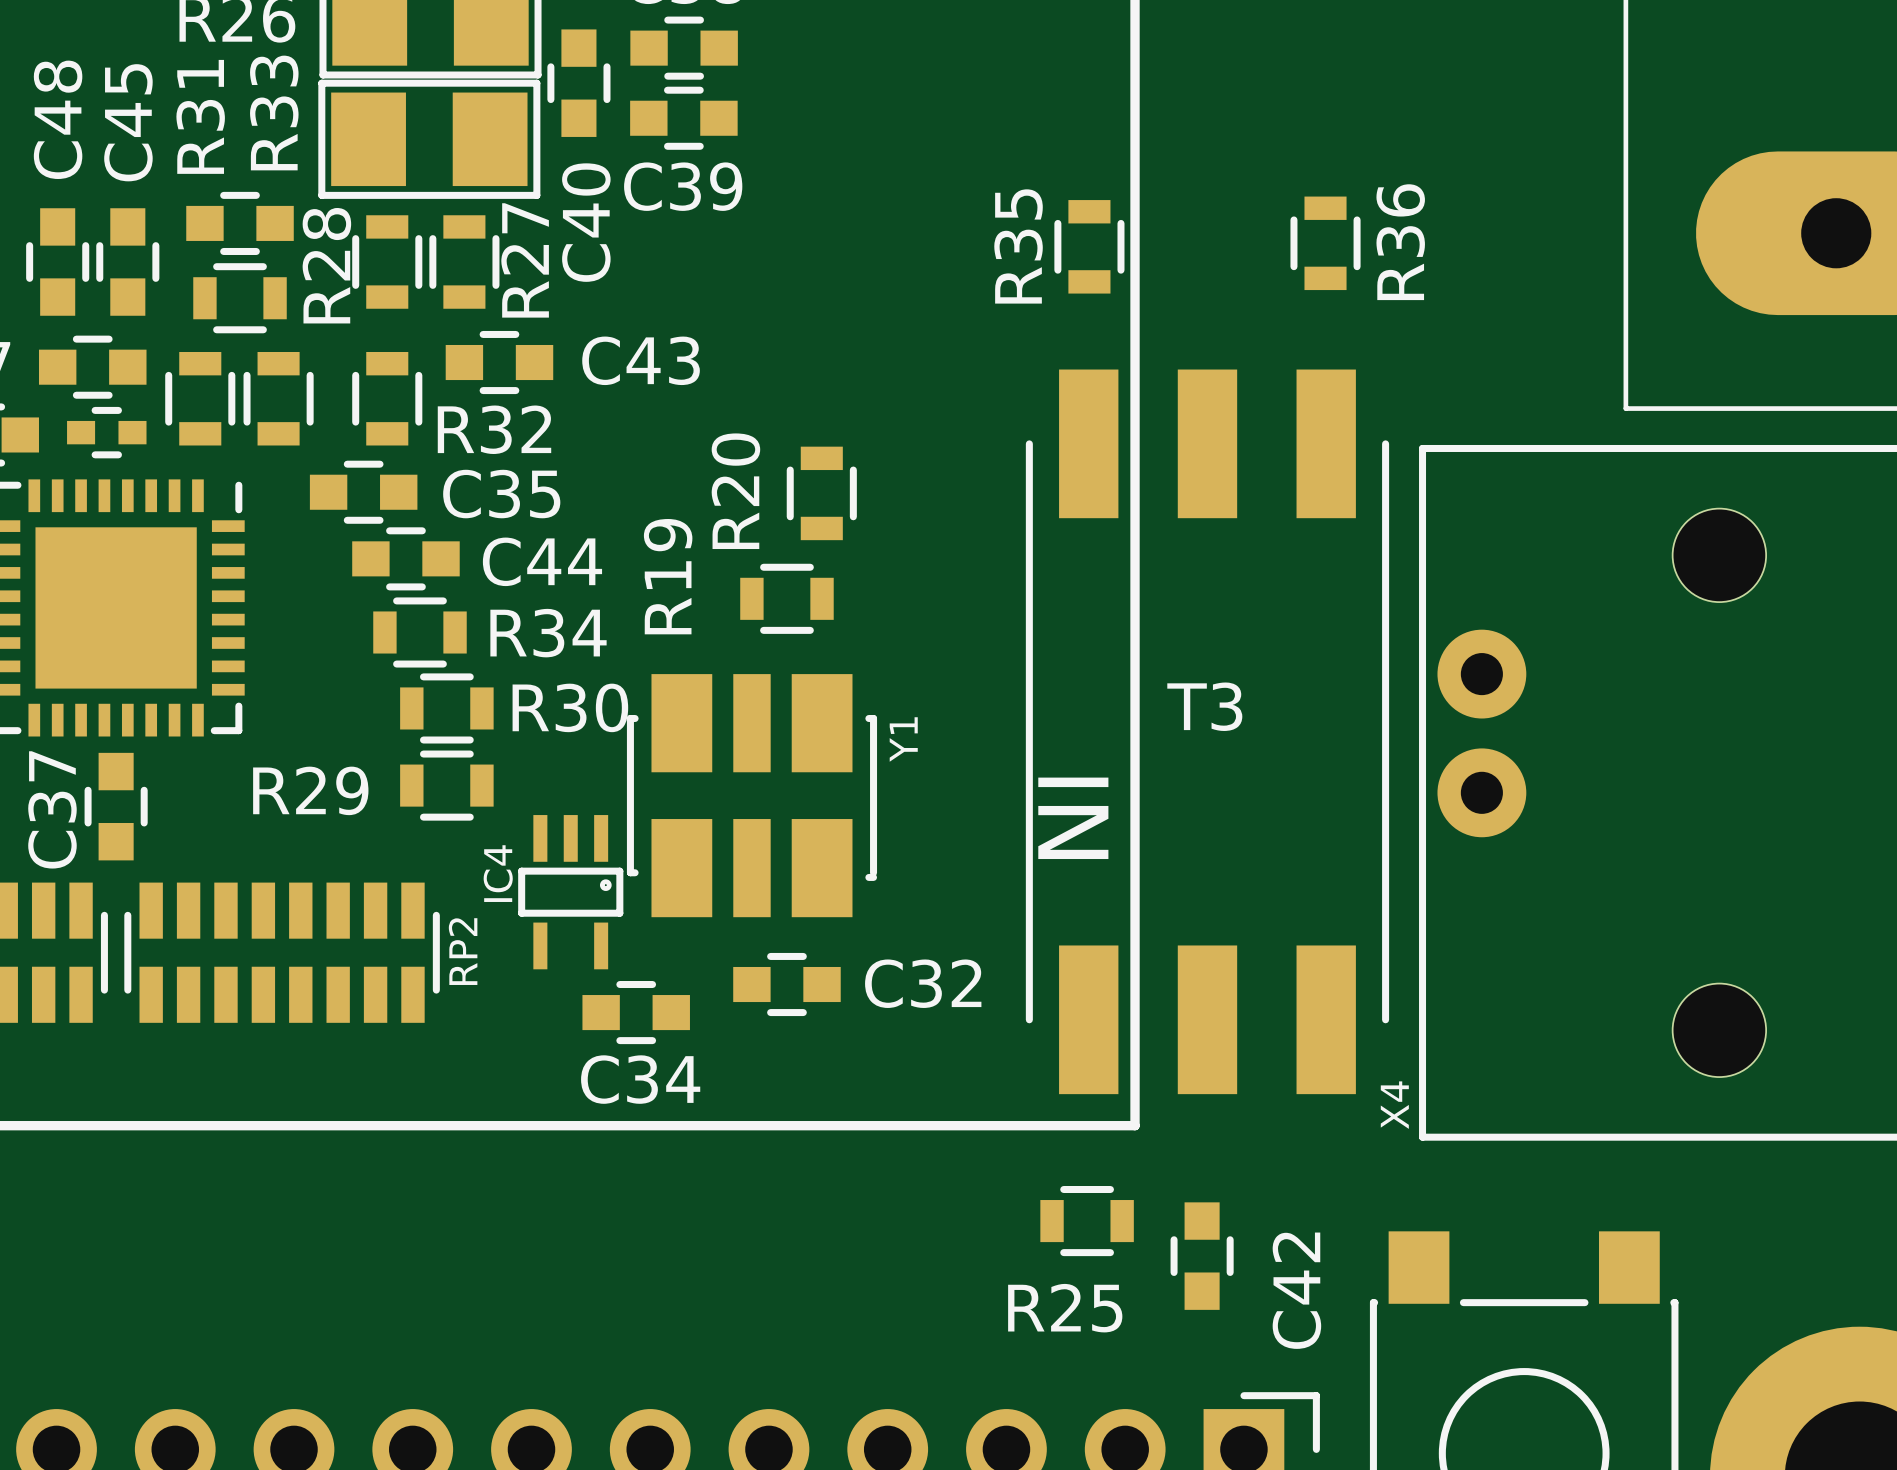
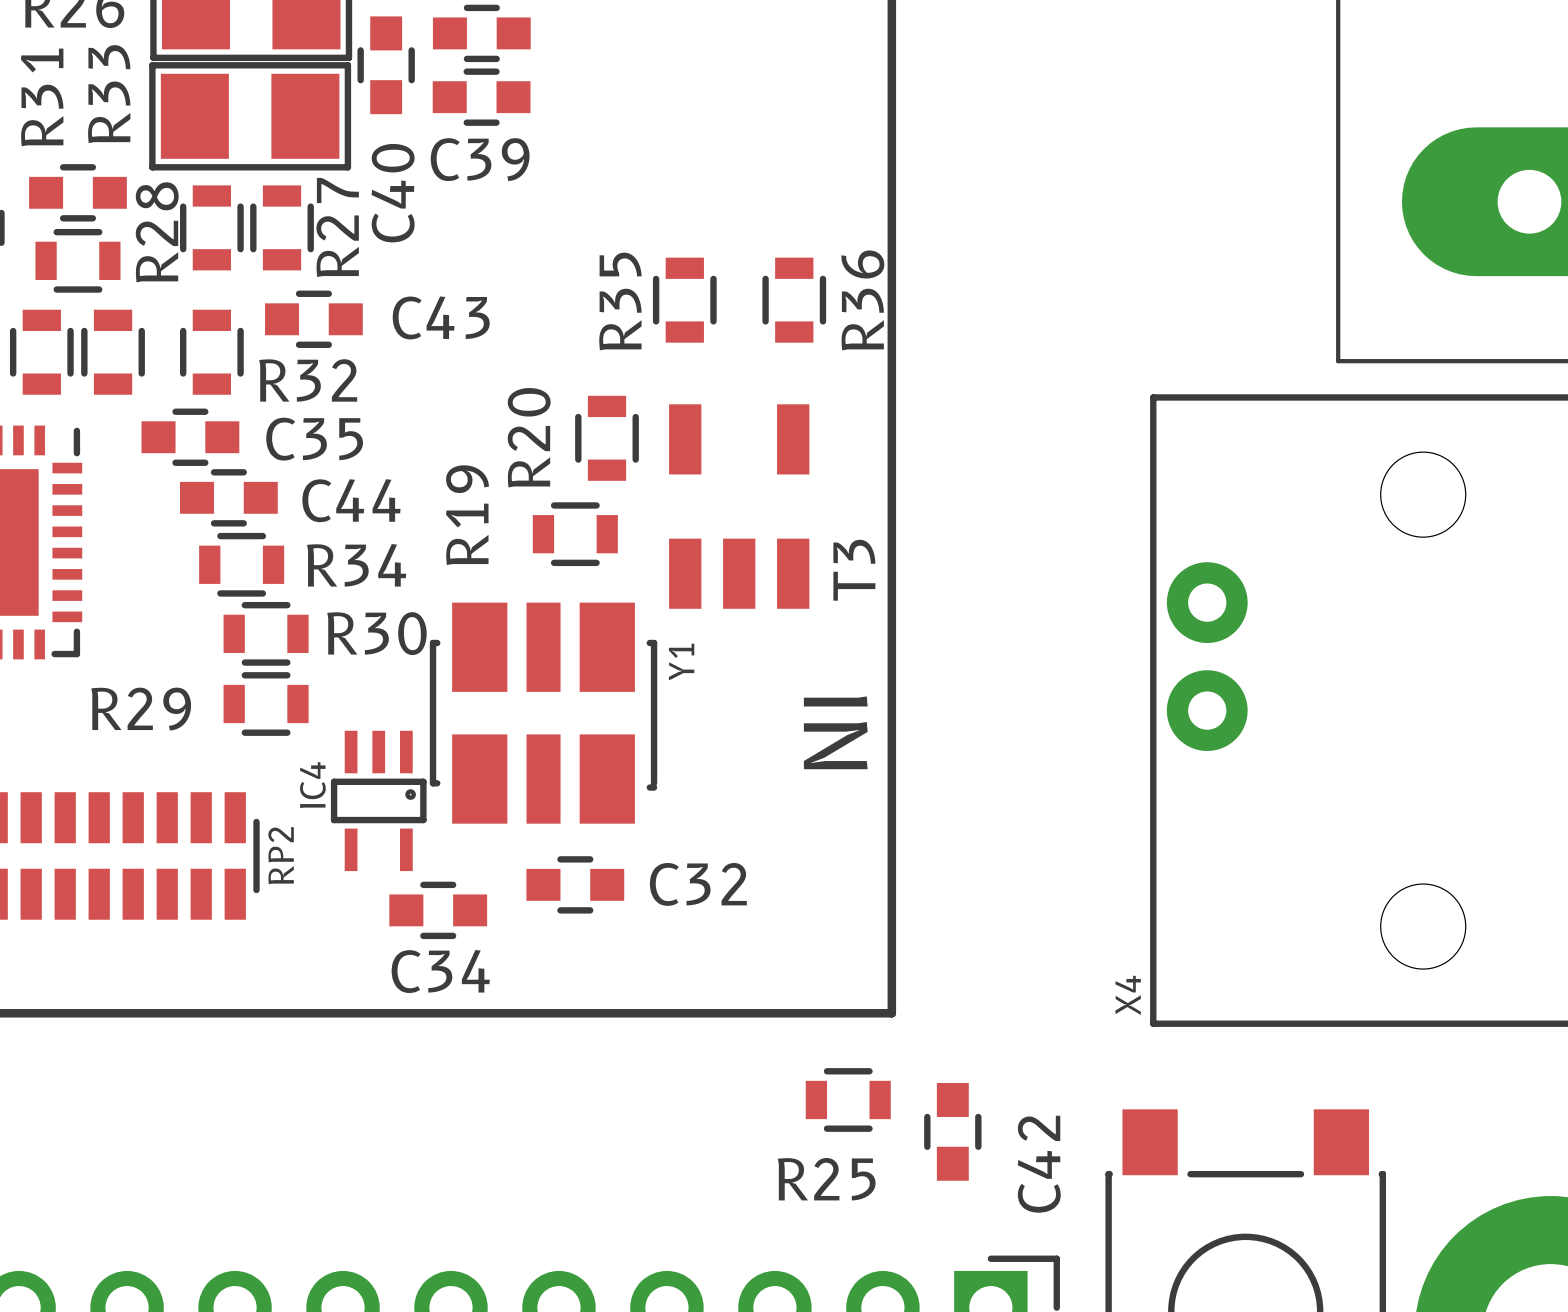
R36 position: (1325, 243) -> (794, 300)
R35 position: (1089, 246) -> (684, 300)
T3 footprint: [1025, 369, 1390, 1095] -> [669, 404, 810, 609]
T3 name position: T3 (1204, 706) -> T3 (854, 570)

